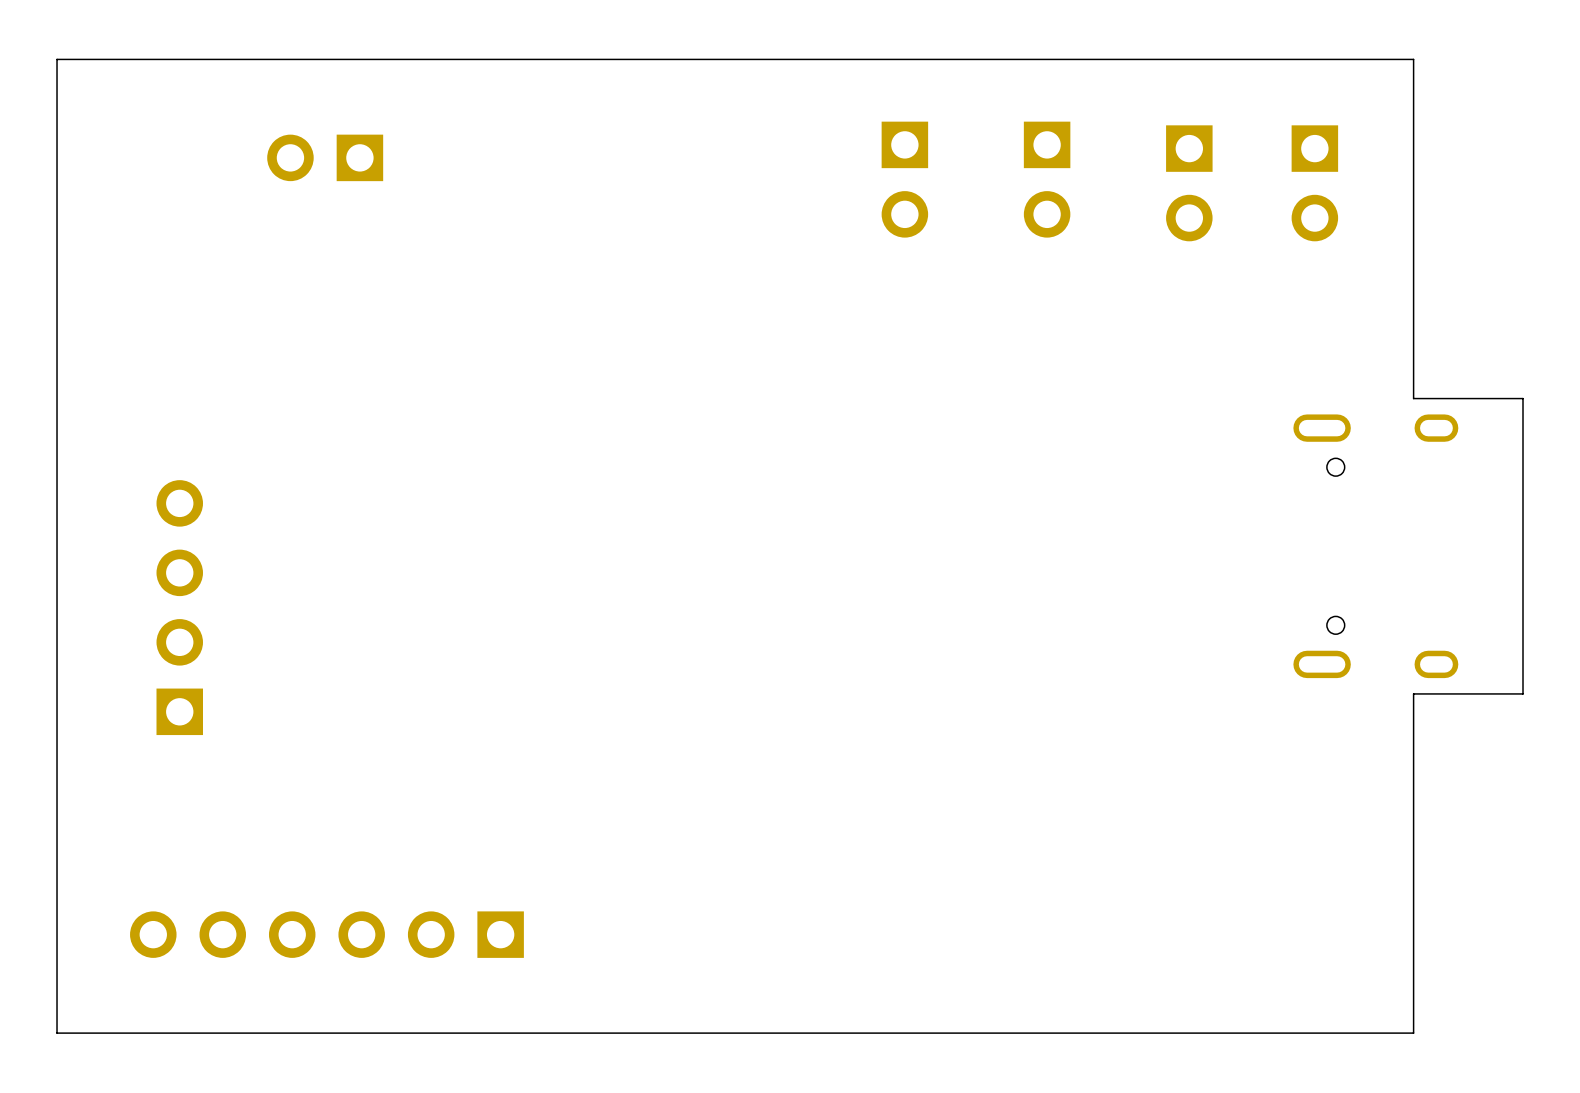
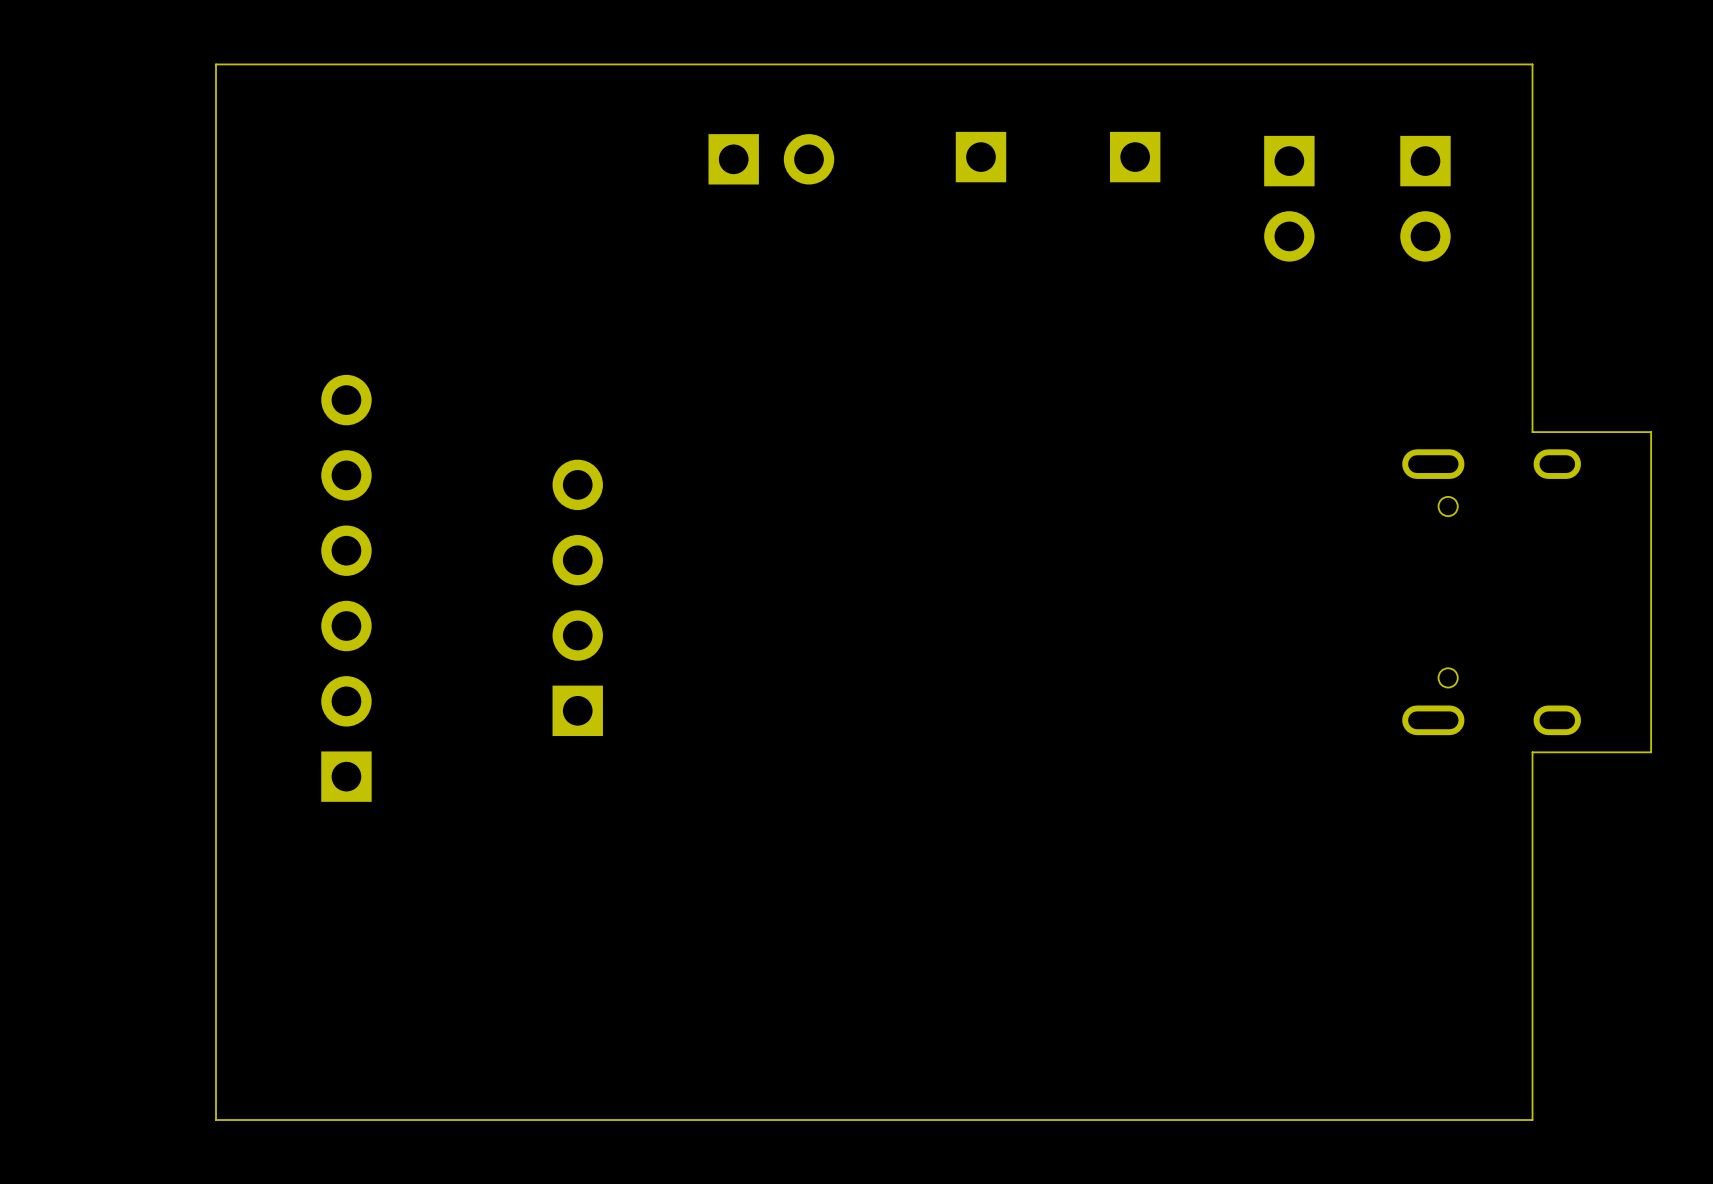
board edge: (199, 59) (57, 59) (57, 1033) (199, 1033) -> (215, 64) (215, 1120)
part: none -> (771, 159)
part: (325, 157) -> none
part: (904, 179) -> none
part: (1047, 179) -> none
part position: (179, 607) -> (577, 597)
part rotation: 0° (326, 934) -> 90° clockwise (346, 588)
part position: (326, 934) -> (346, 588)

